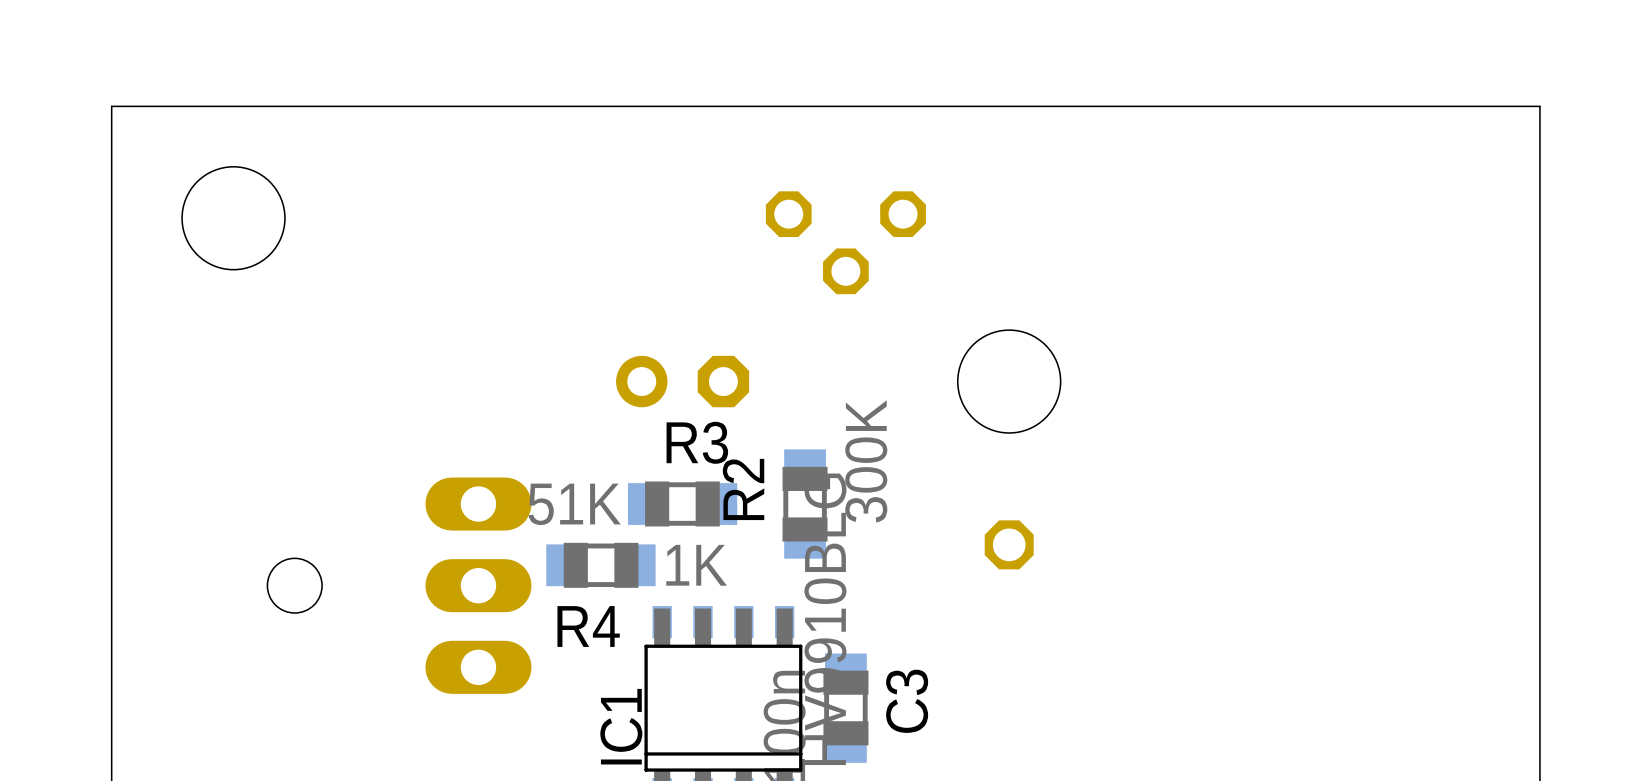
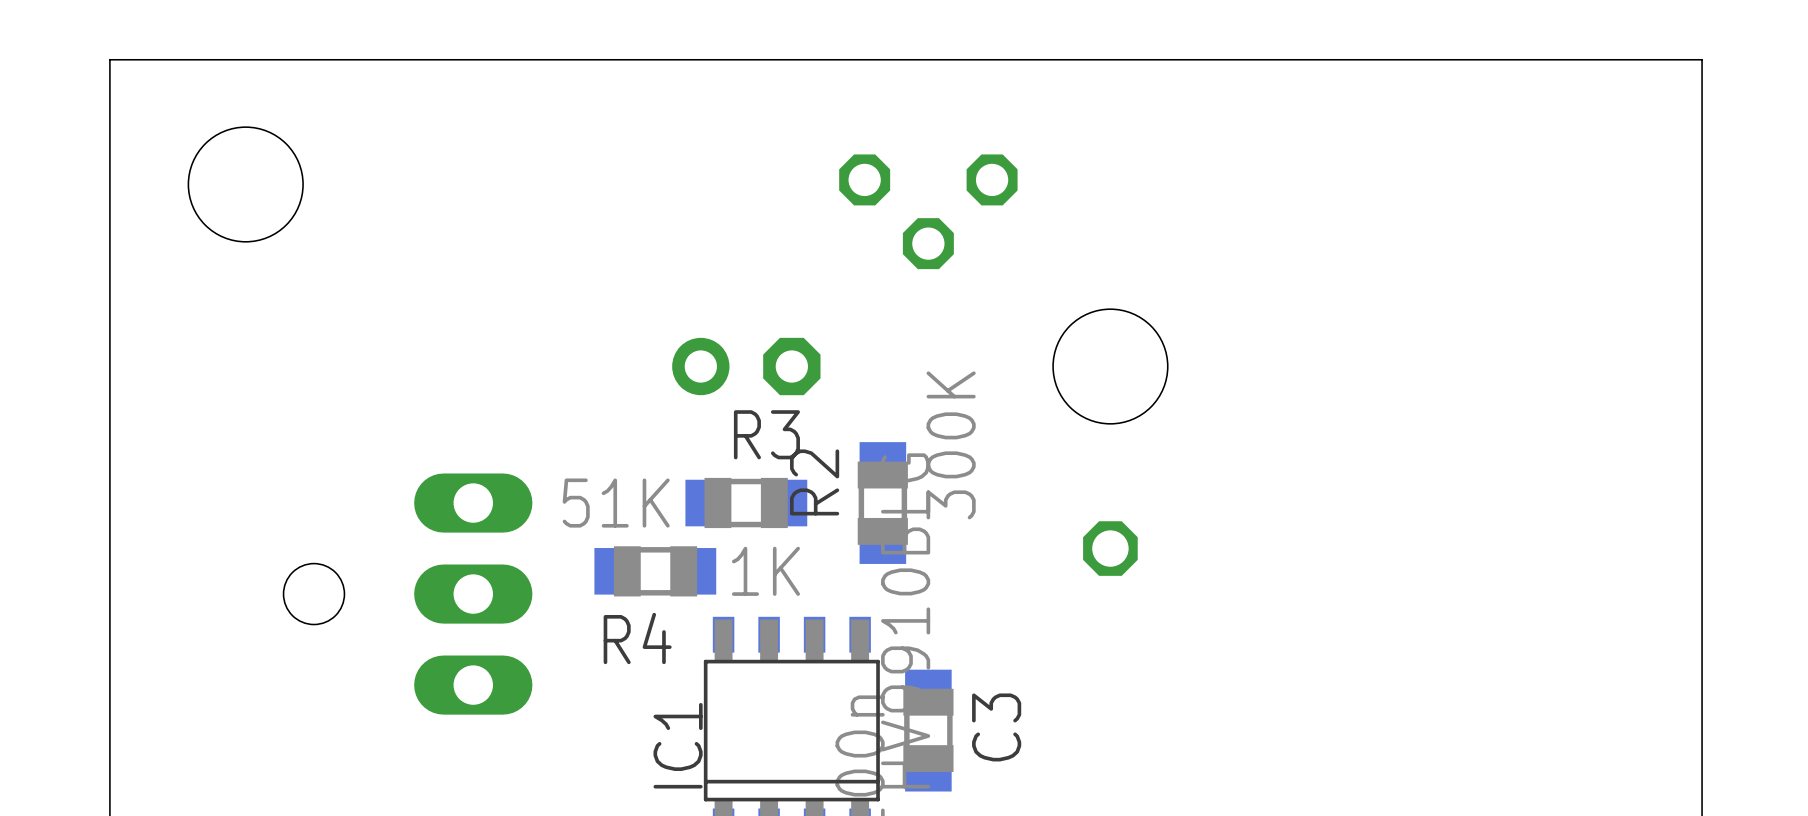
part position: (478, 585) -> (473, 594)

